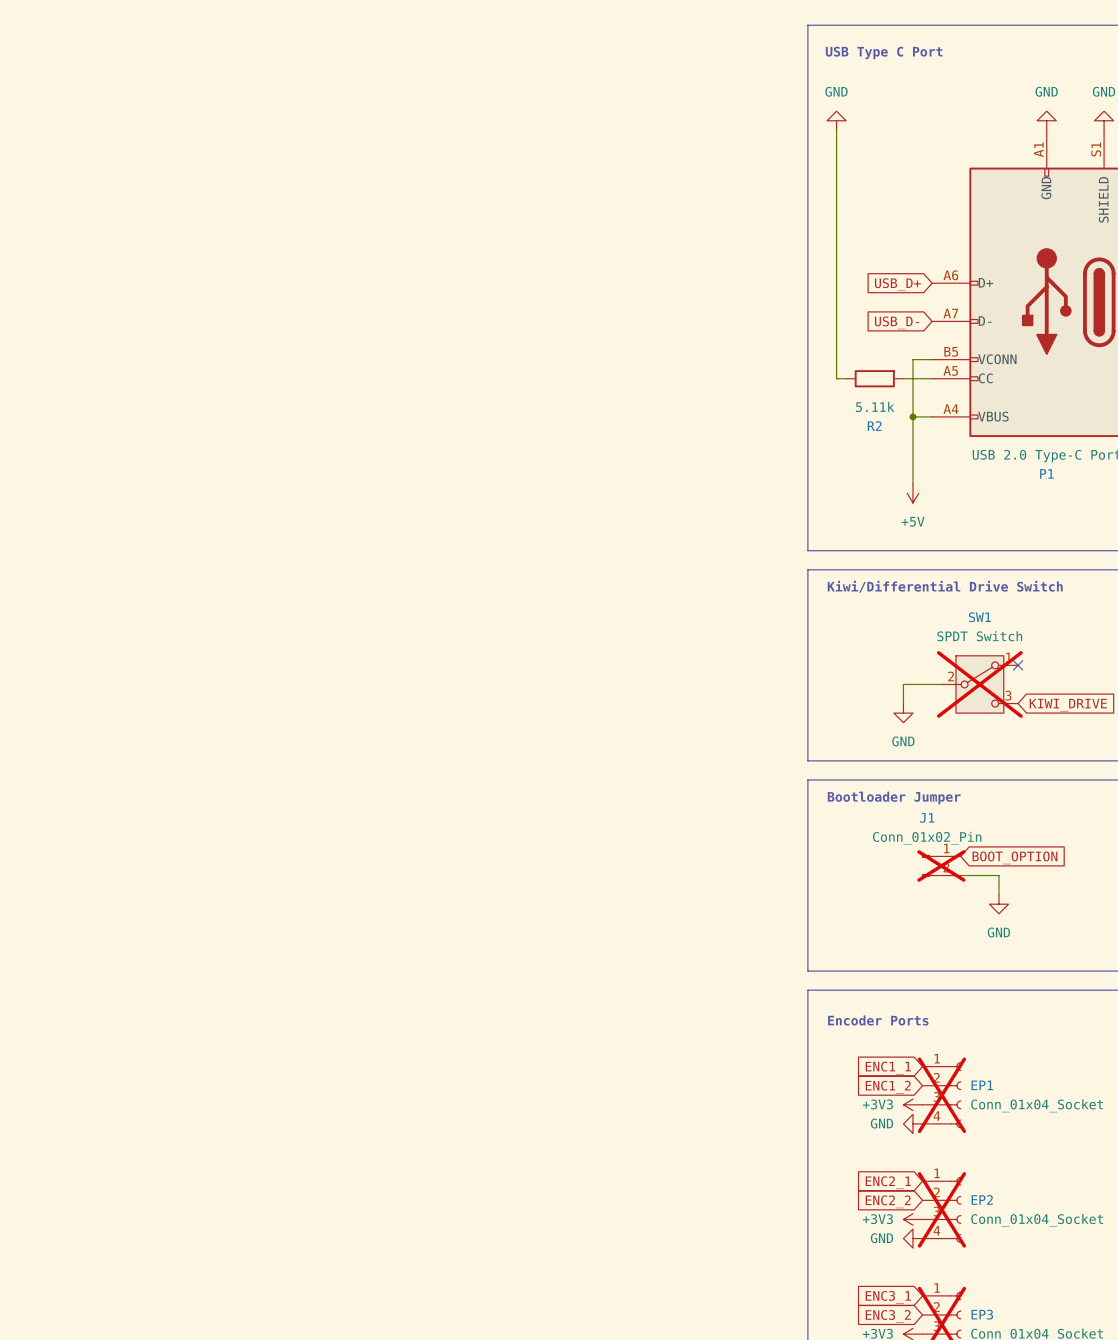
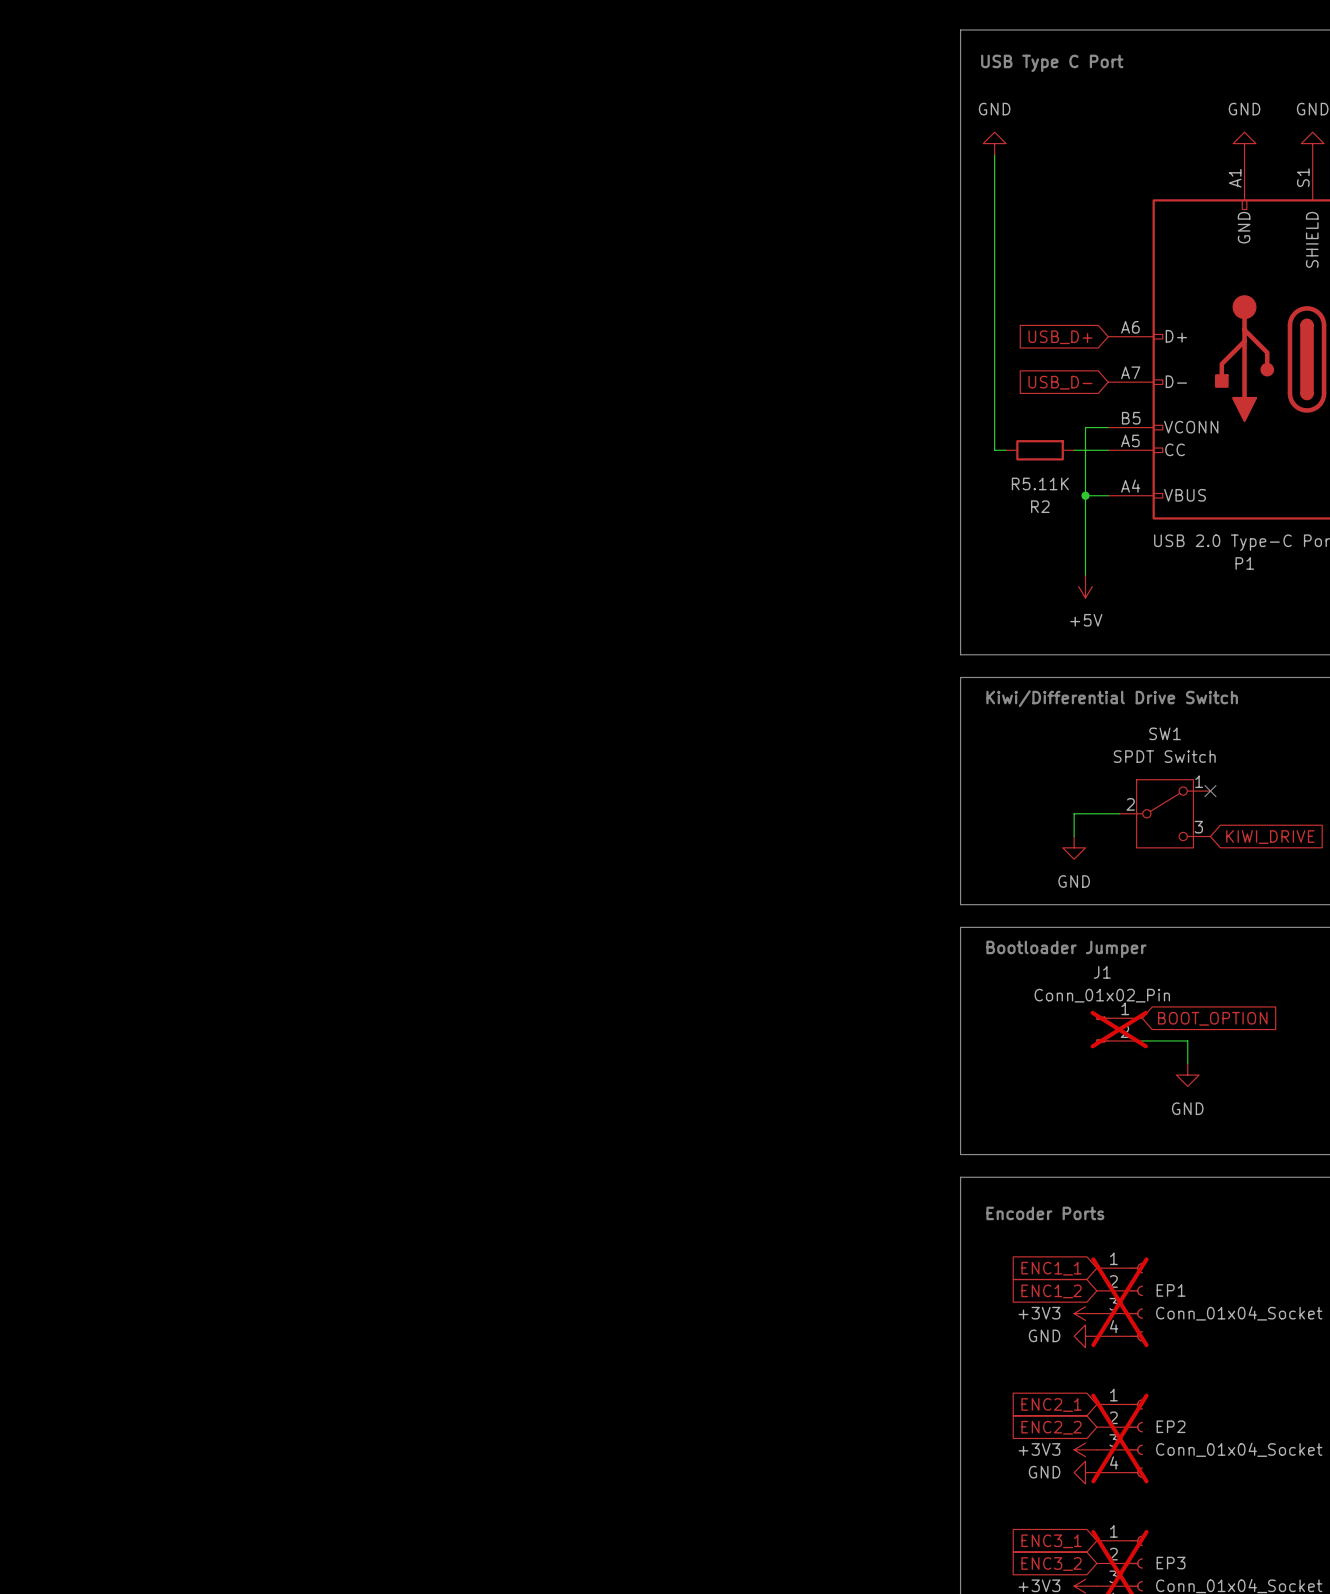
R2 value: 5.11k (875, 406) -> R5.11K (1040, 483)
SW1 do-not-place cross: (979, 684) -> none

